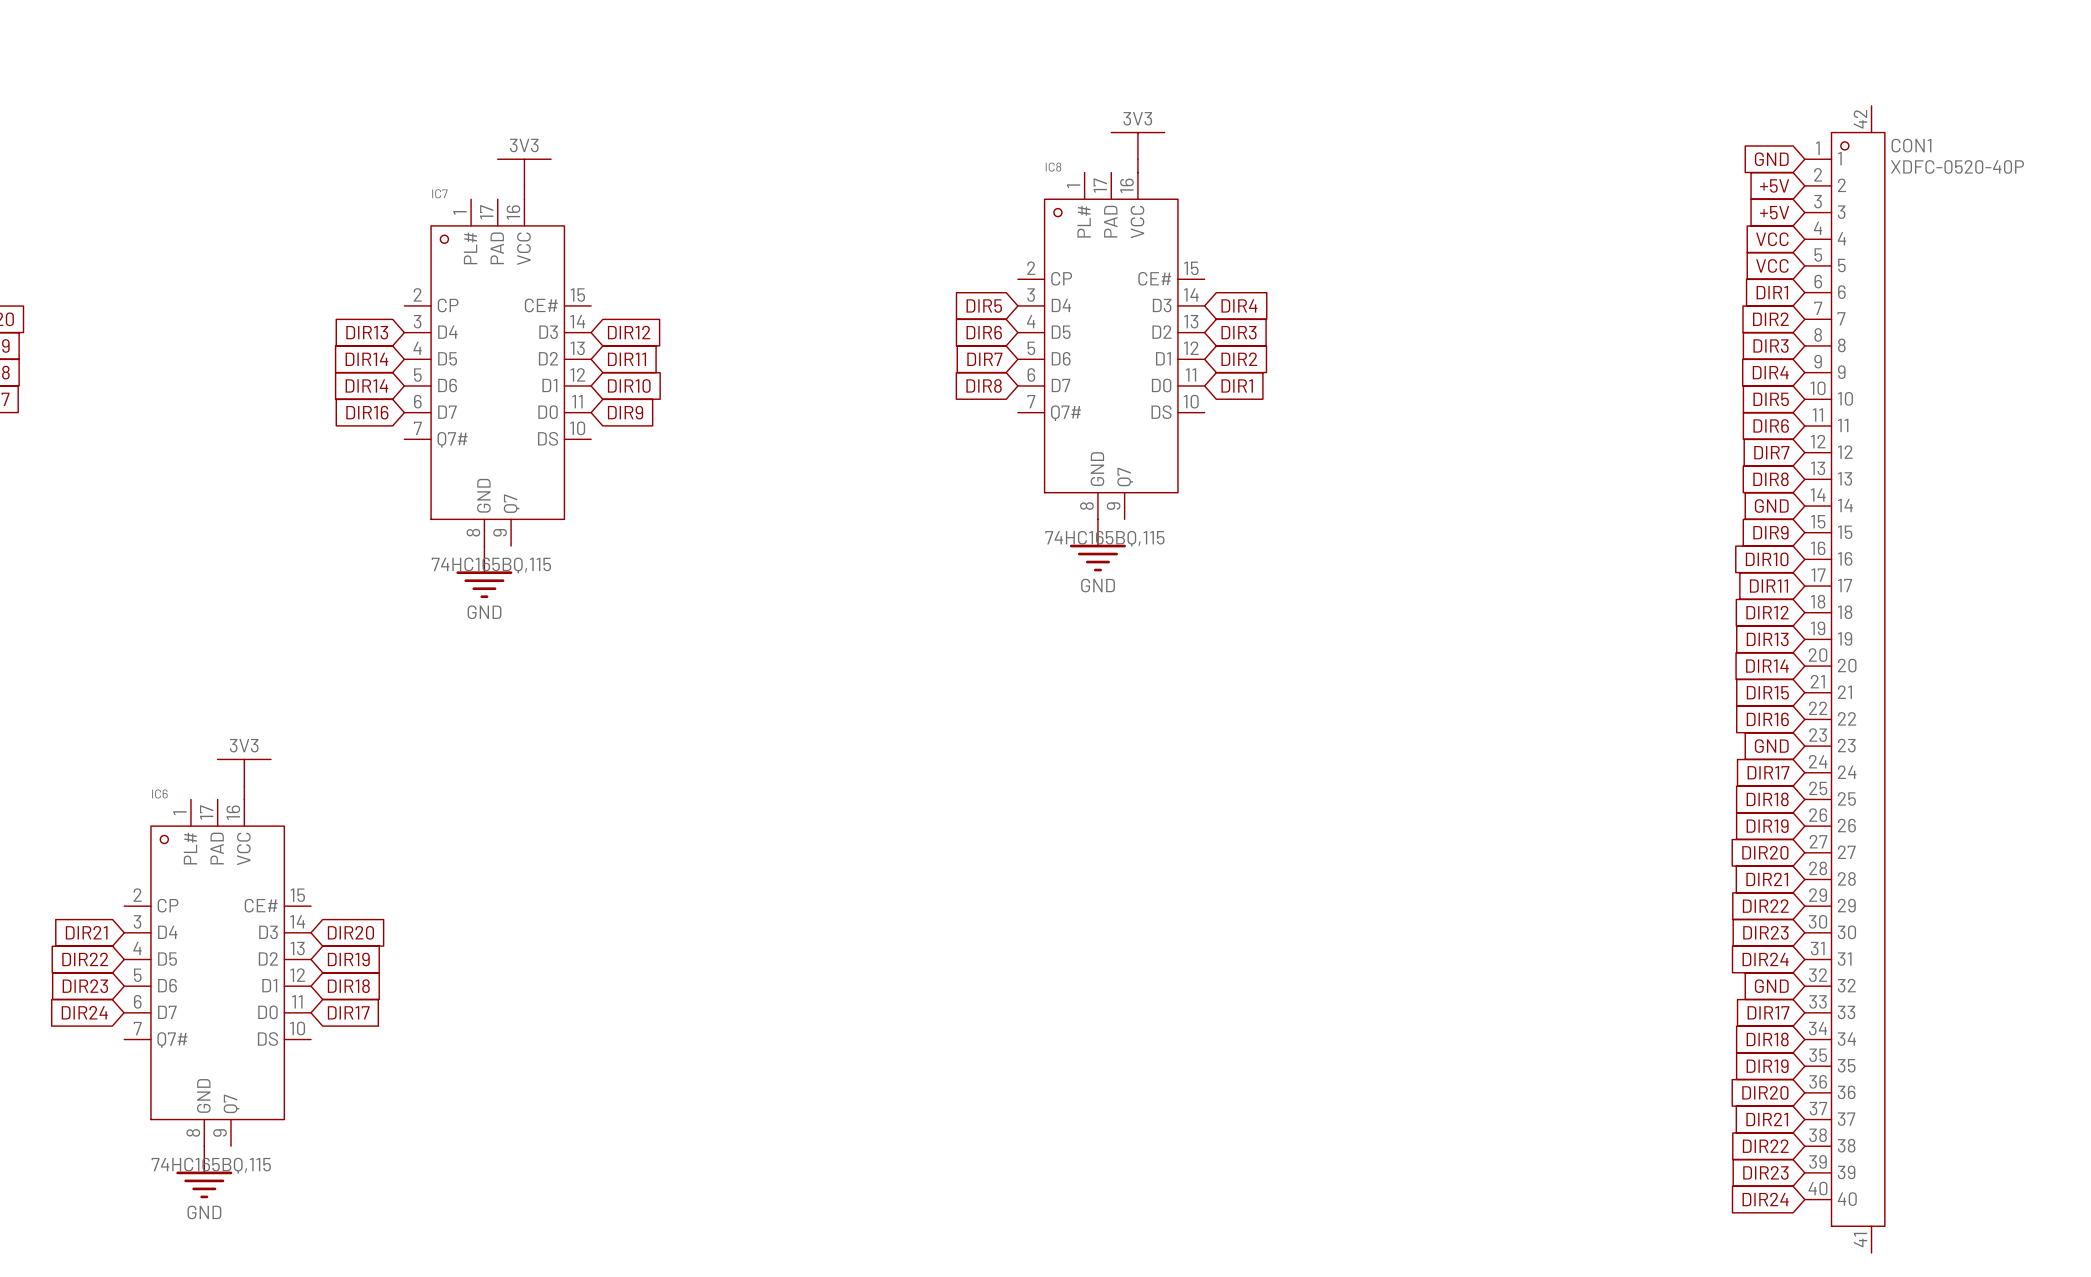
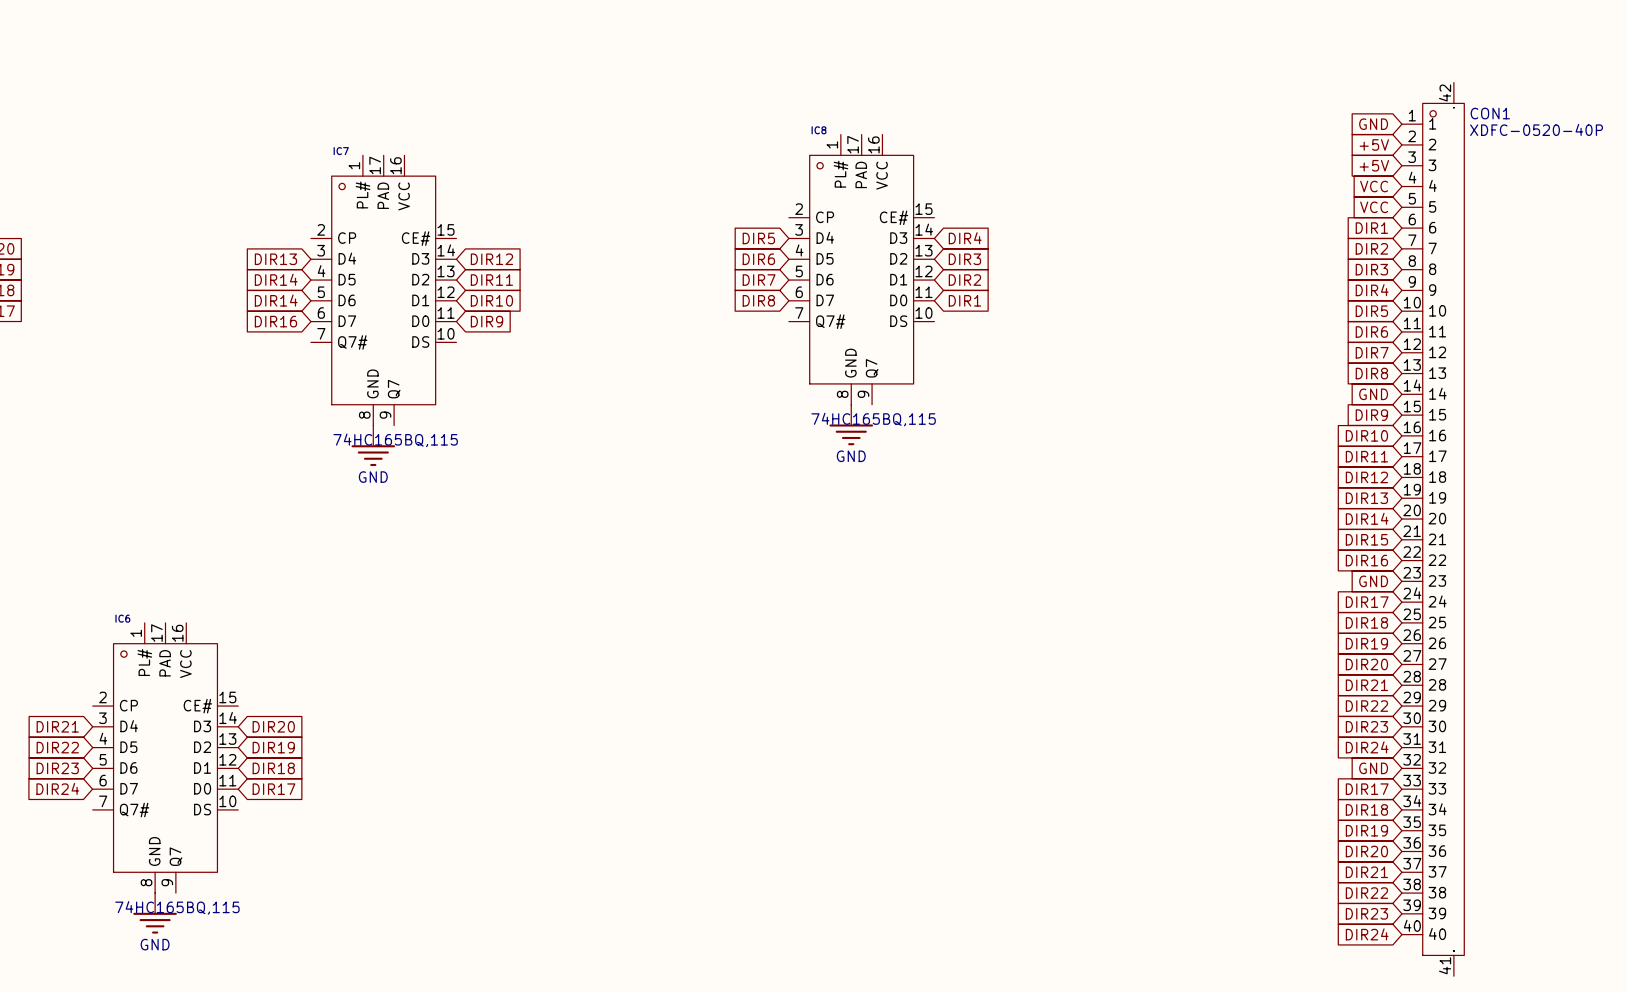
power symbol: 3V3 (1137, 152) -> none
power symbol: 3V3 (524, 179) -> none
power symbol: 3V3 (244, 779) -> none

